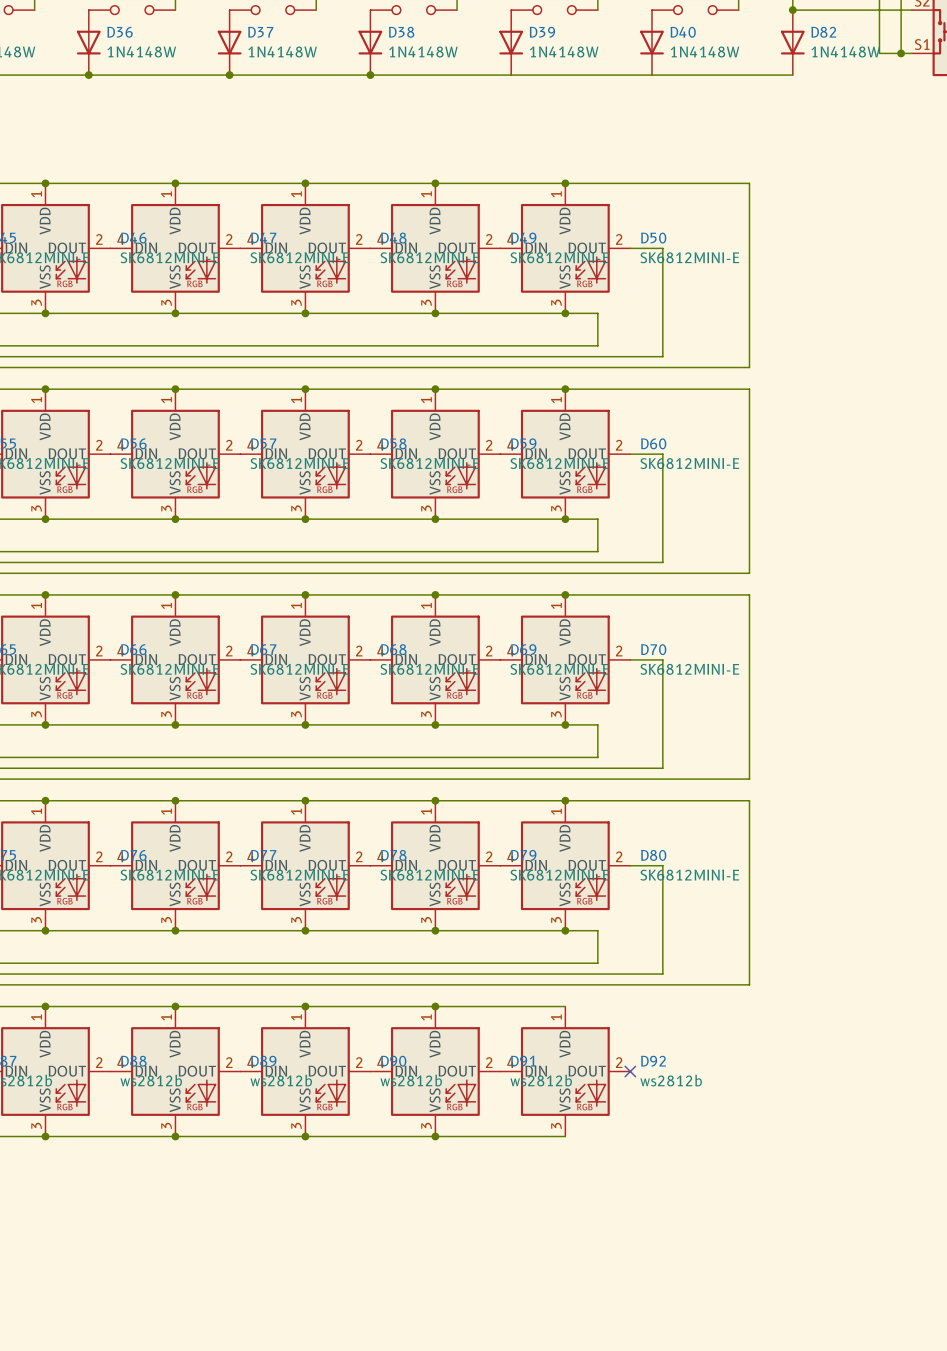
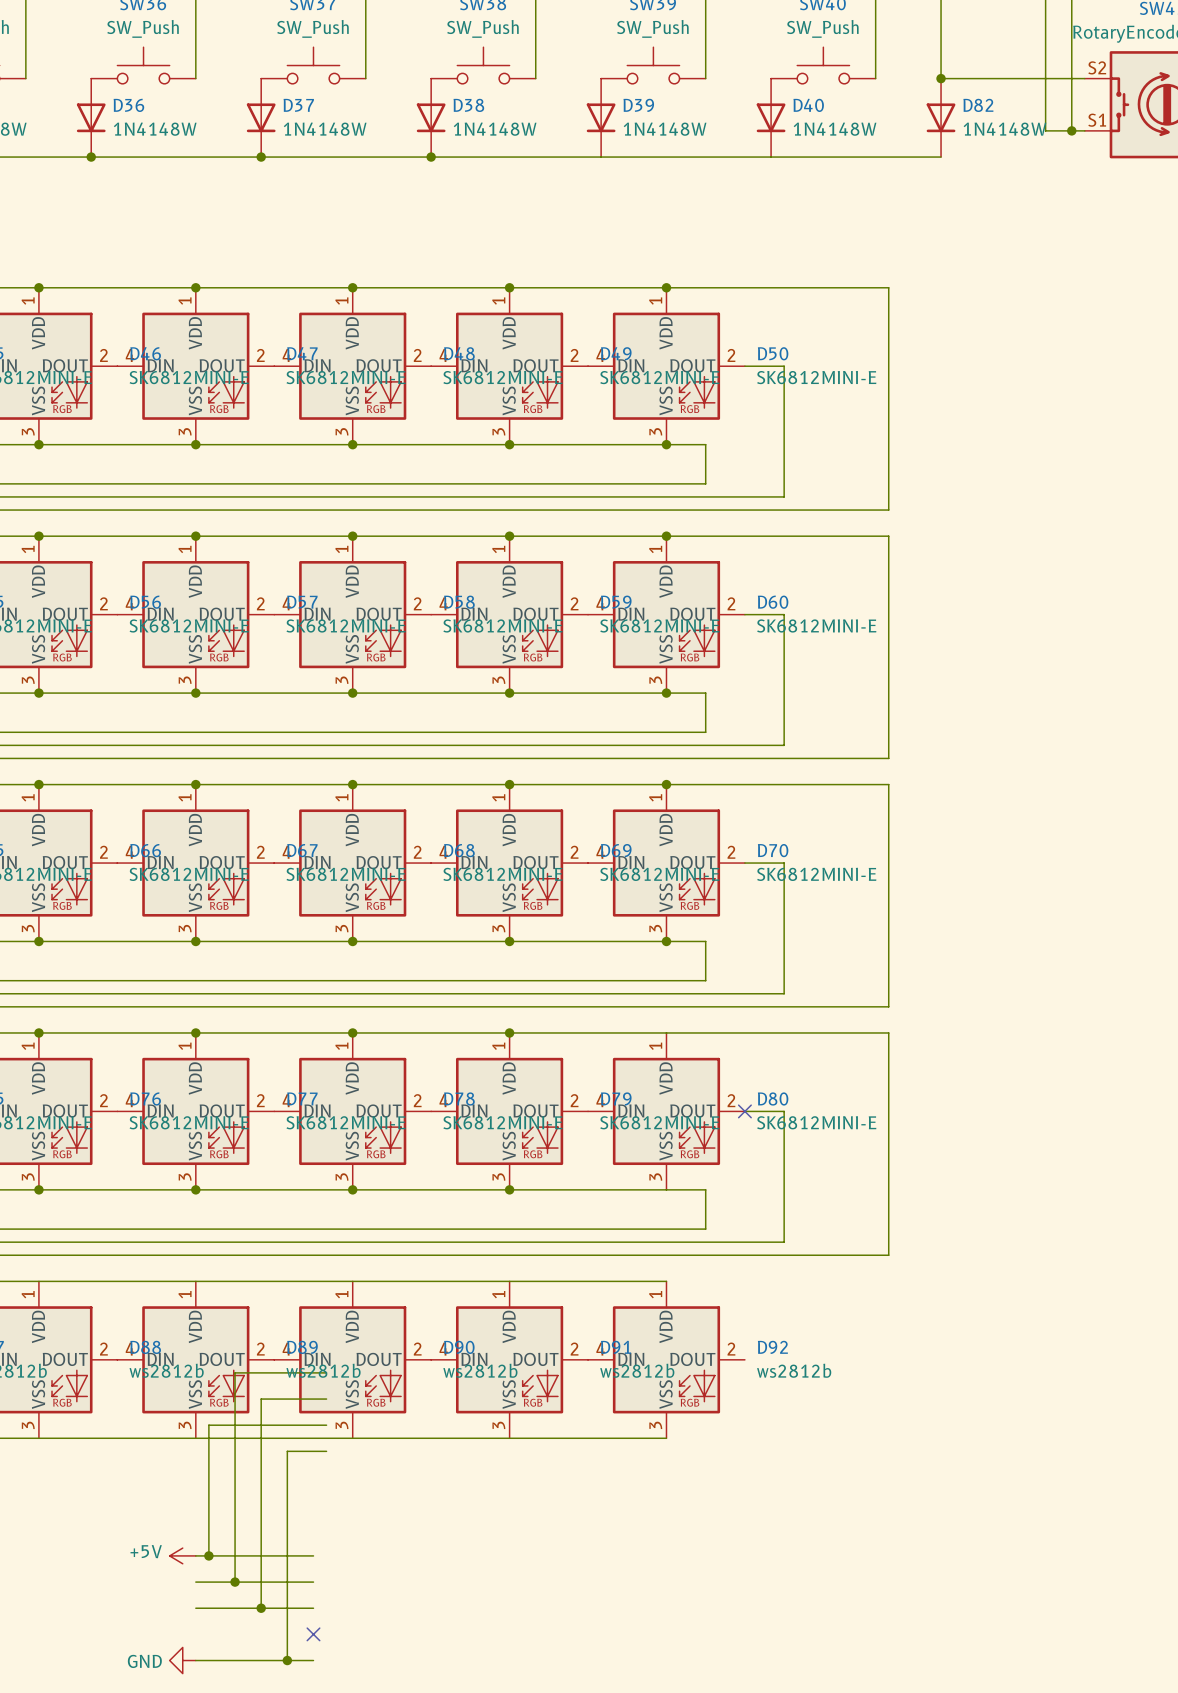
junction: (565, 800) -> none
no-connect mark: none -> (744, 1111)
junction: (565, 930) -> none
junction: (45, 1006) -> none
junction: (175, 1006) -> none
junction: (305, 1006) -> none
junction: (435, 1006) -> none
no-connect mark: (630, 1071) -> none
wire: none -> (326, 1372) (235, 1372) (235, 1582)
wire: none -> (326, 1399) (261, 1399) (261, 1608)
wire: none -> (326, 1425) (208, 1425) (208, 1555)
junction: (45, 1136) -> none
junction: (175, 1136) -> none
junction: (305, 1136) -> none
junction: (435, 1136) -> none
wire: none -> (326, 1451) (287, 1451) (287, 1660)
power symbol: none -> +5V (182, 1555)
wire: none -> (195, 1555) (313, 1555)
junction: none -> (208, 1555)
wire: none -> (195, 1582) (313, 1582)
junction: none -> (235, 1582)
wire: none -> (195, 1608) (313, 1608)
junction: none -> (261, 1608)
no-connect mark: none -> (313, 1634)
power symbol: none -> GND (182, 1660)
wire: none -> (195, 1660) (313, 1660)
junction: none -> (287, 1660)

